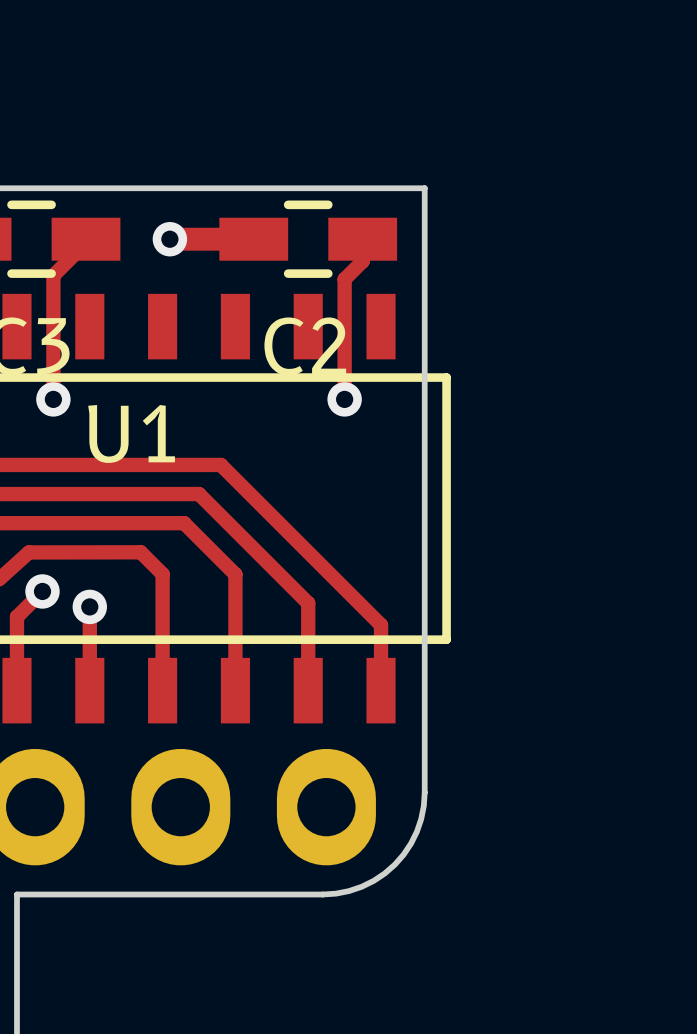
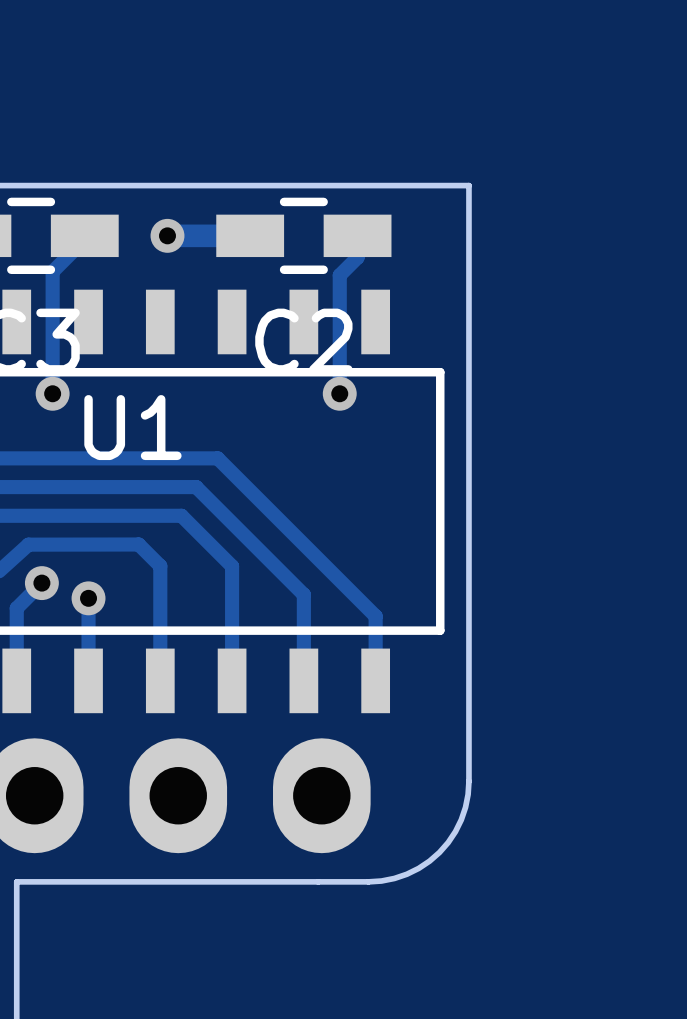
board edge: (424, 188) (423, 805) (416, 831) (403, 854) (394, 864) (373, 880) (361, 886) (349, 891) (322, 894) -> (418, 185) (468, 185) (468, 794) (461, 819) (455, 831) (439, 852) (418, 868) (394, 878) (381, 881) (318, 881)

